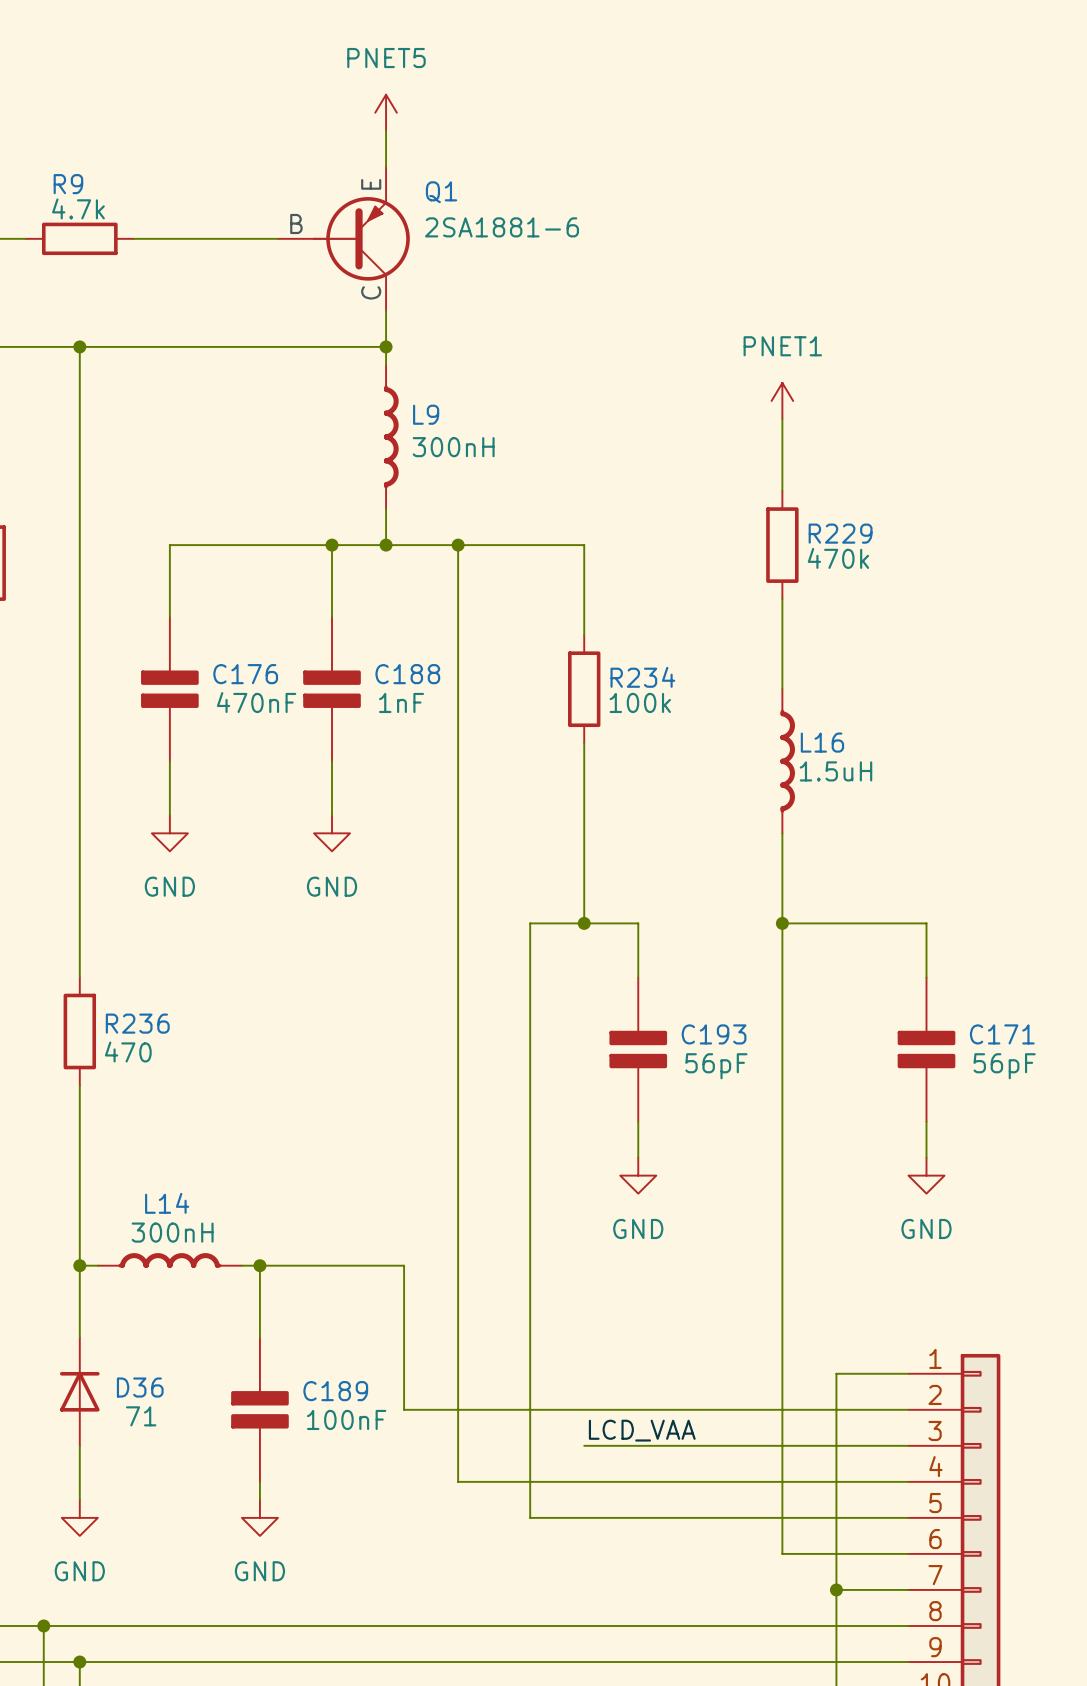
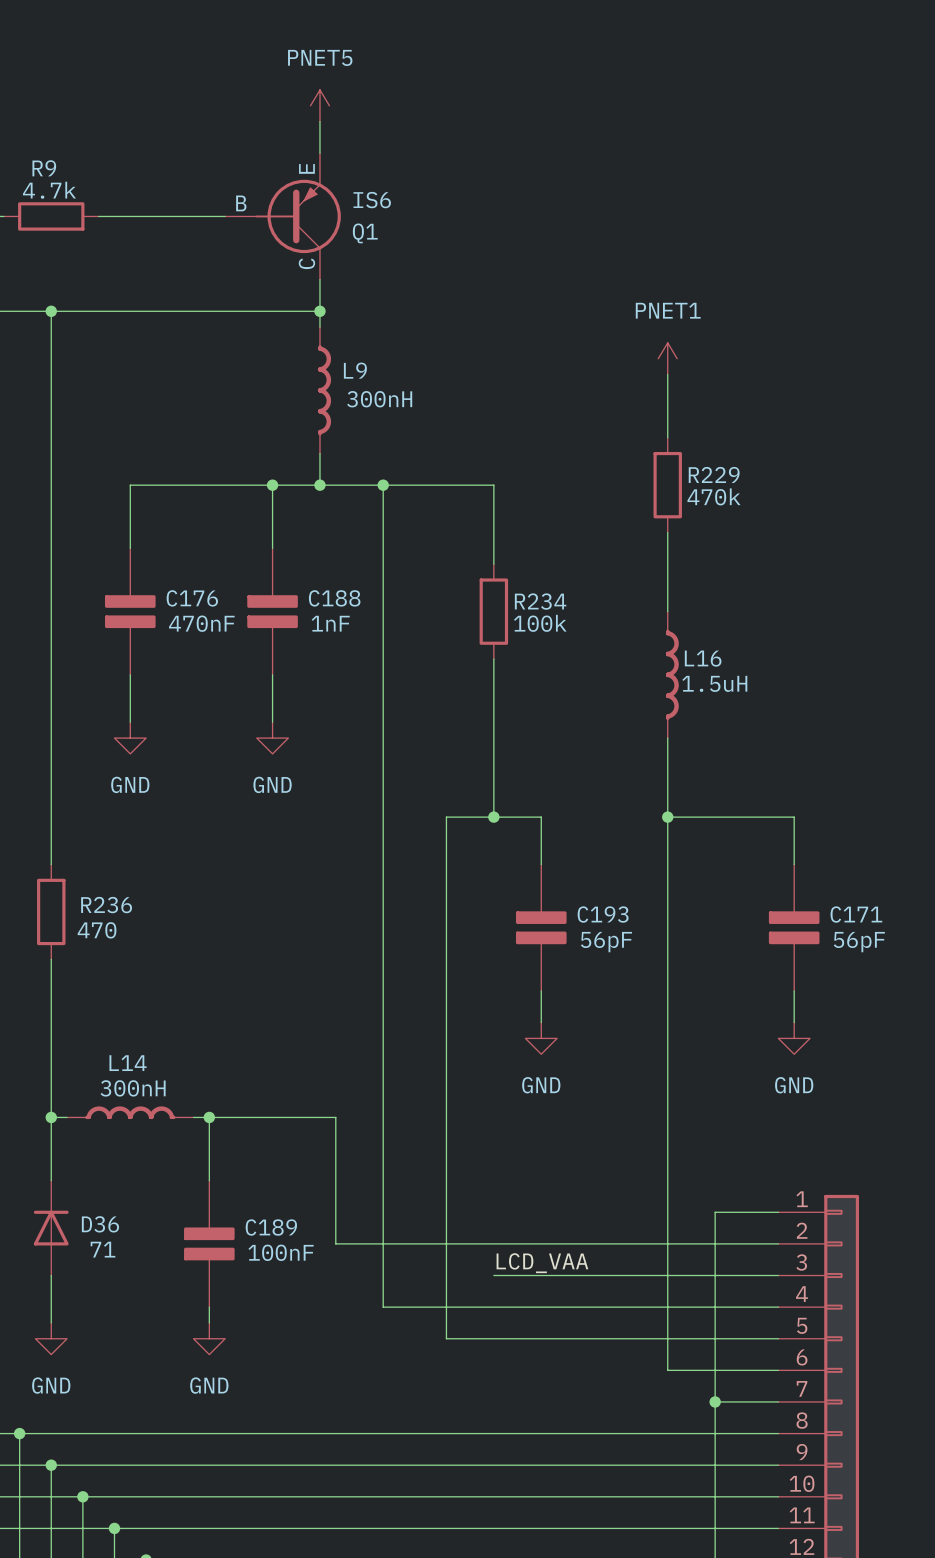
Q1 name position: Q1 (441, 192) -> Q1 (365, 233)
Q1 value: 2SA1881-6 (502, 227) -> IS6 (372, 200)

